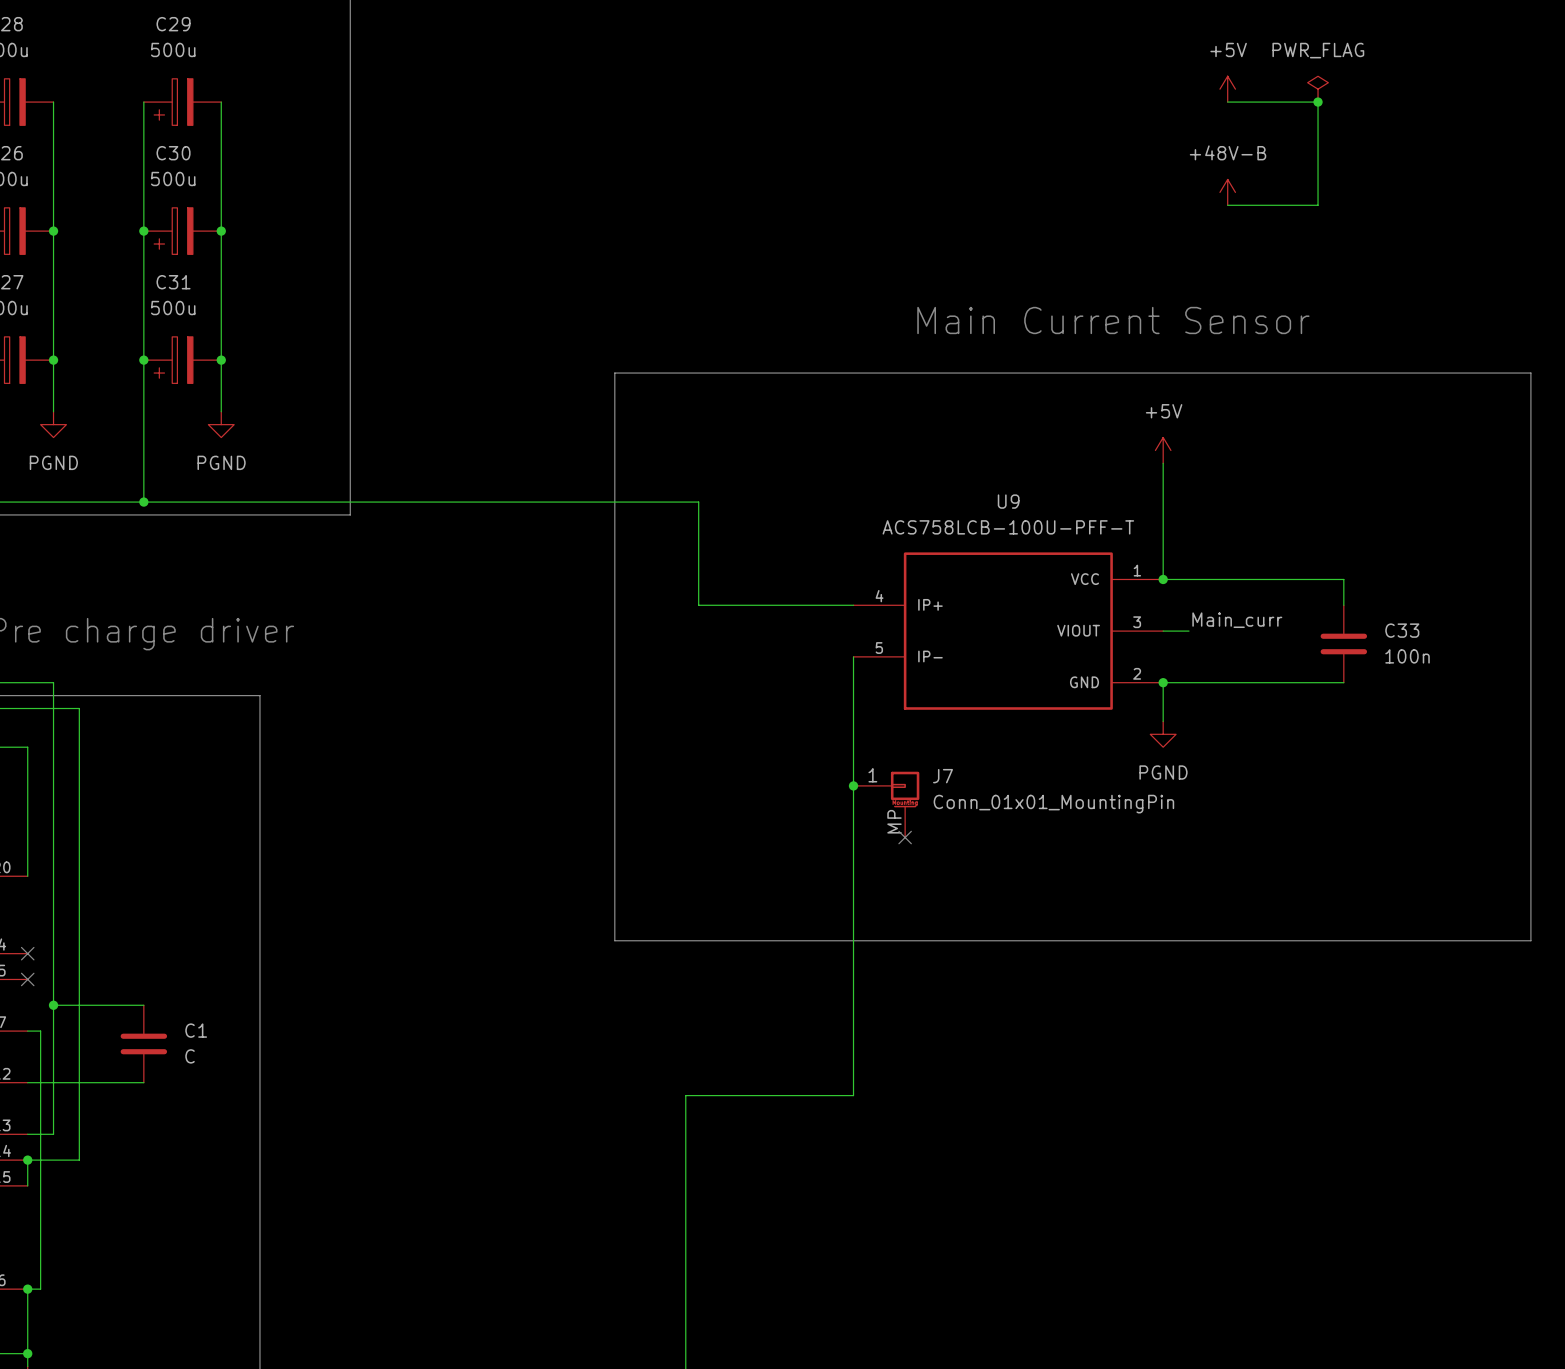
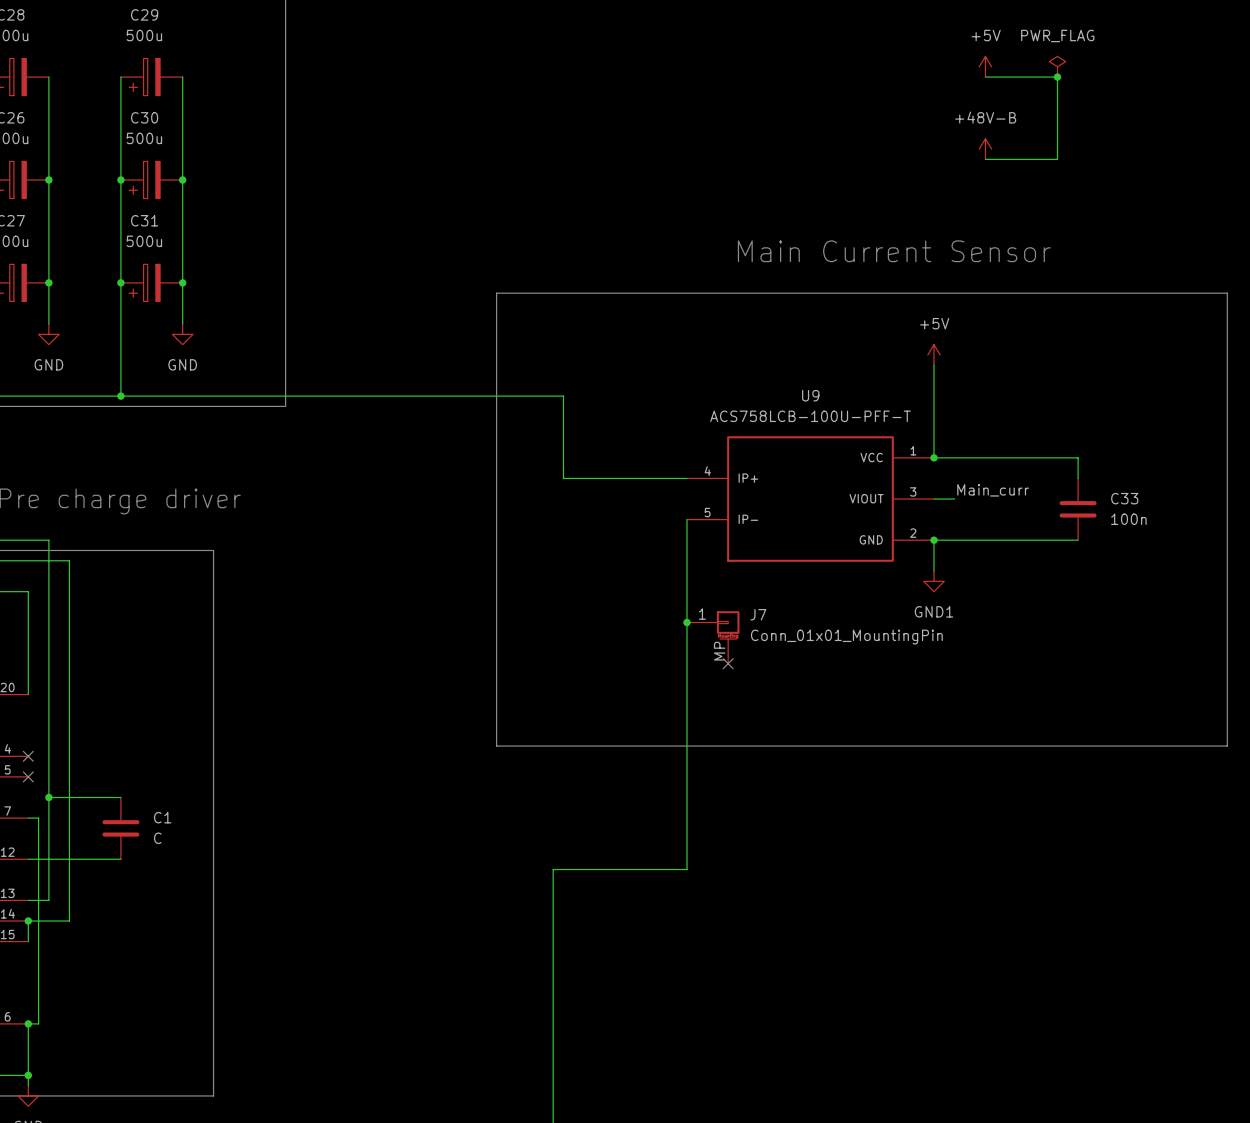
power symbol: PGND (53, 424) -> GND (48, 334)
power symbol: PGND (221, 424) -> GND (182, 334)
power symbol: PGND (1163, 734) -> GND1 (934, 581)

